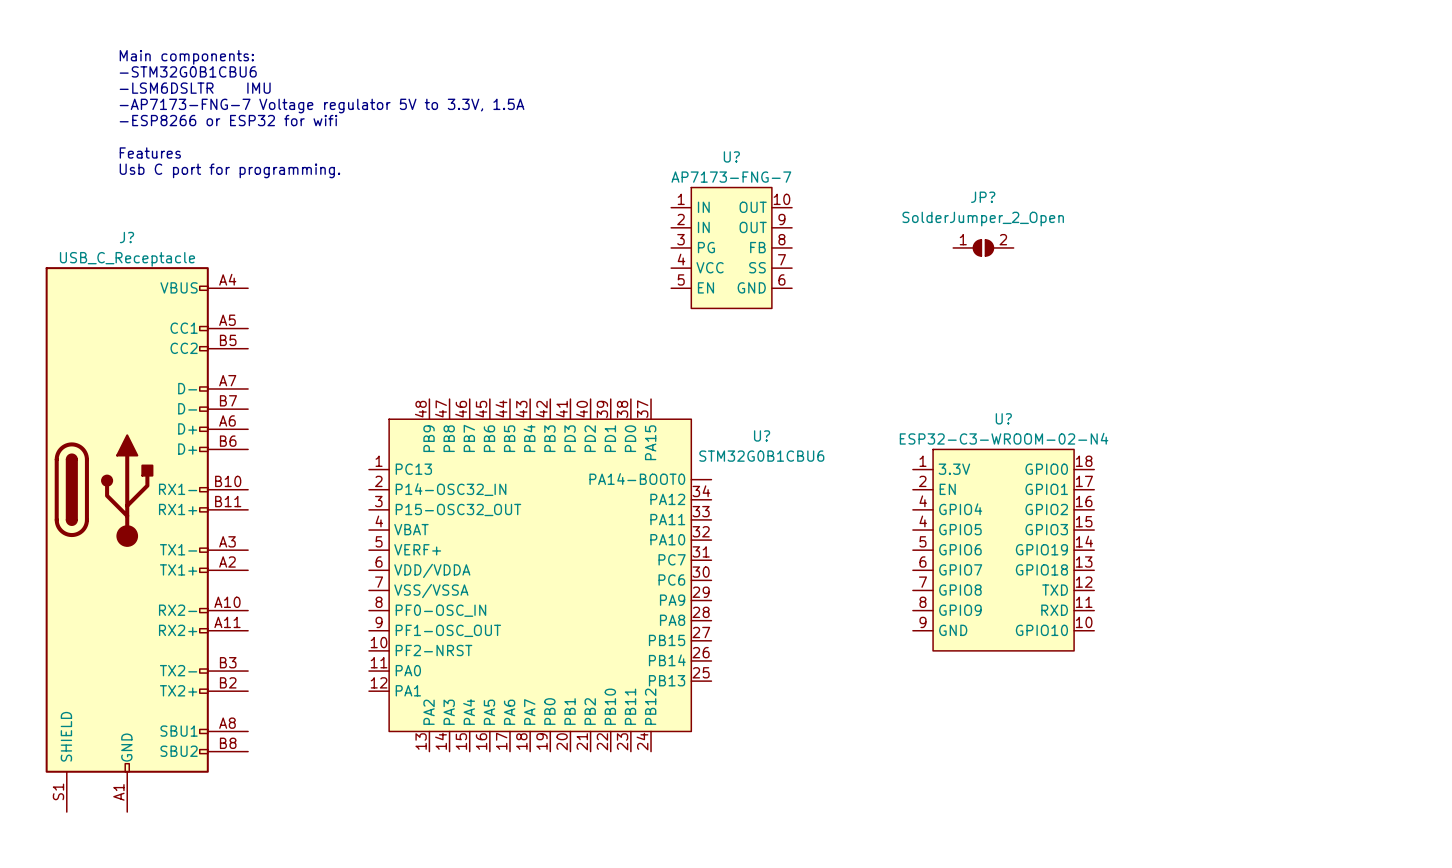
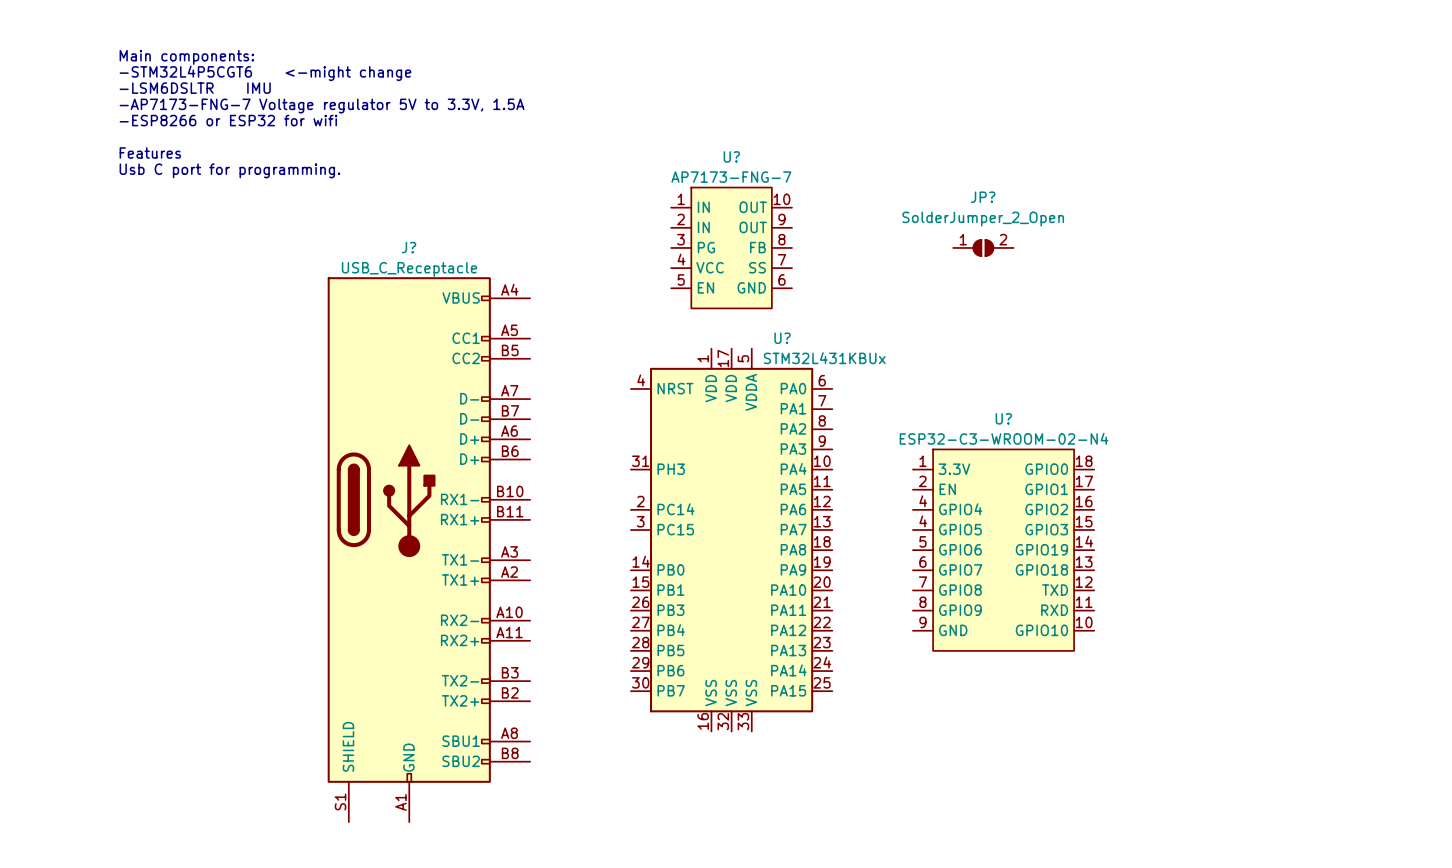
text: -STM32G0B1CBU6 (188, 71) -> -STM32L4P5CGT6 <-might change (265, 73)
J?: USB_C_Receptacle (146, 539) -> none
U?: none -> STM32L431KBUx (731, 540)
J?: none -> USB_C_Receptacle (428, 549)
U?: STM32G0B1CBU6 (540, 575) -> none

